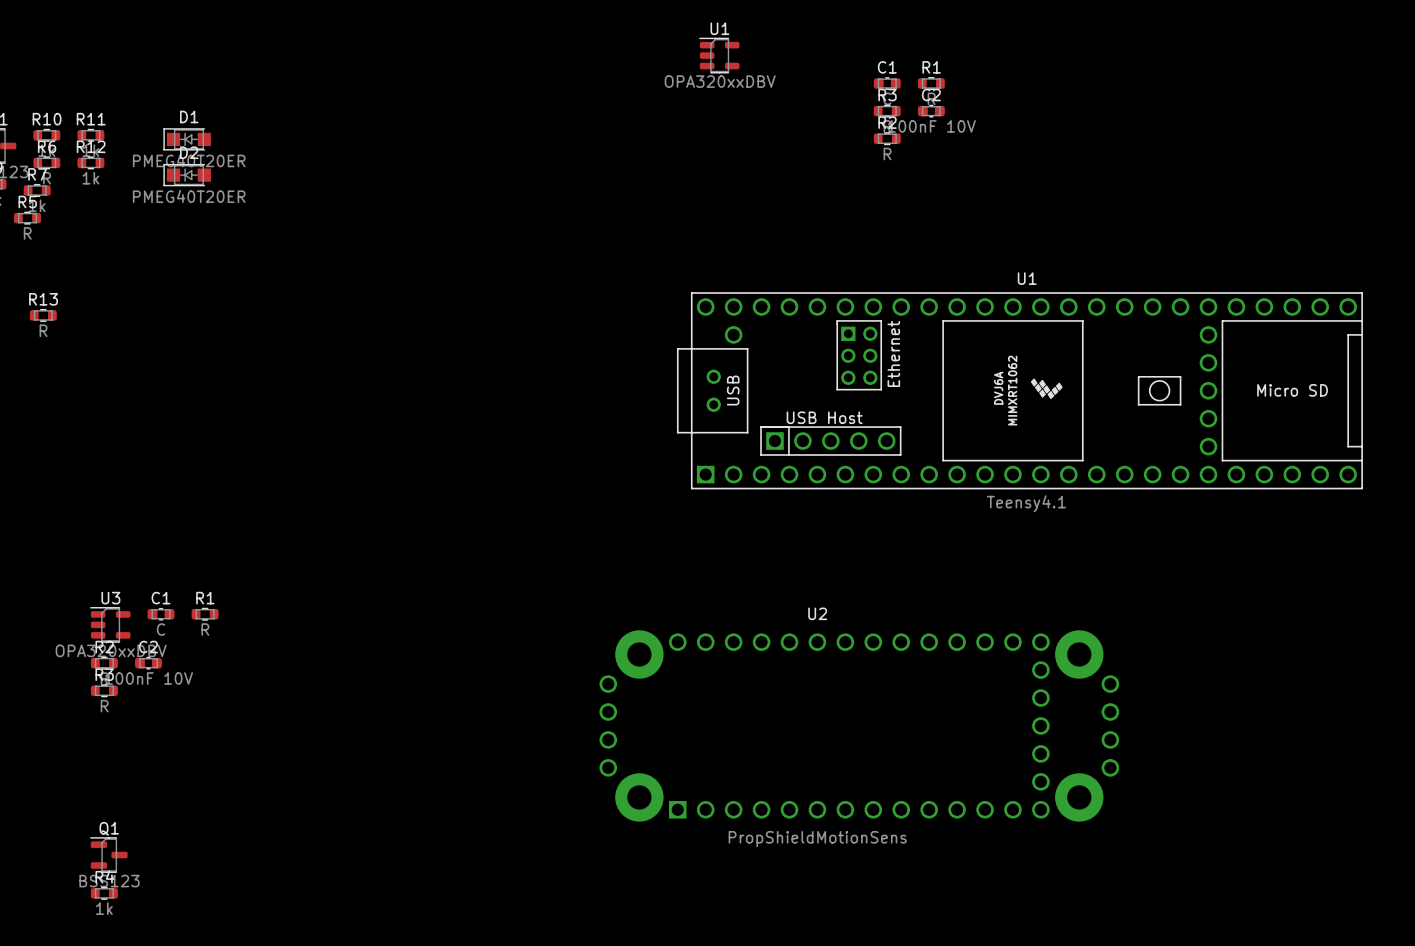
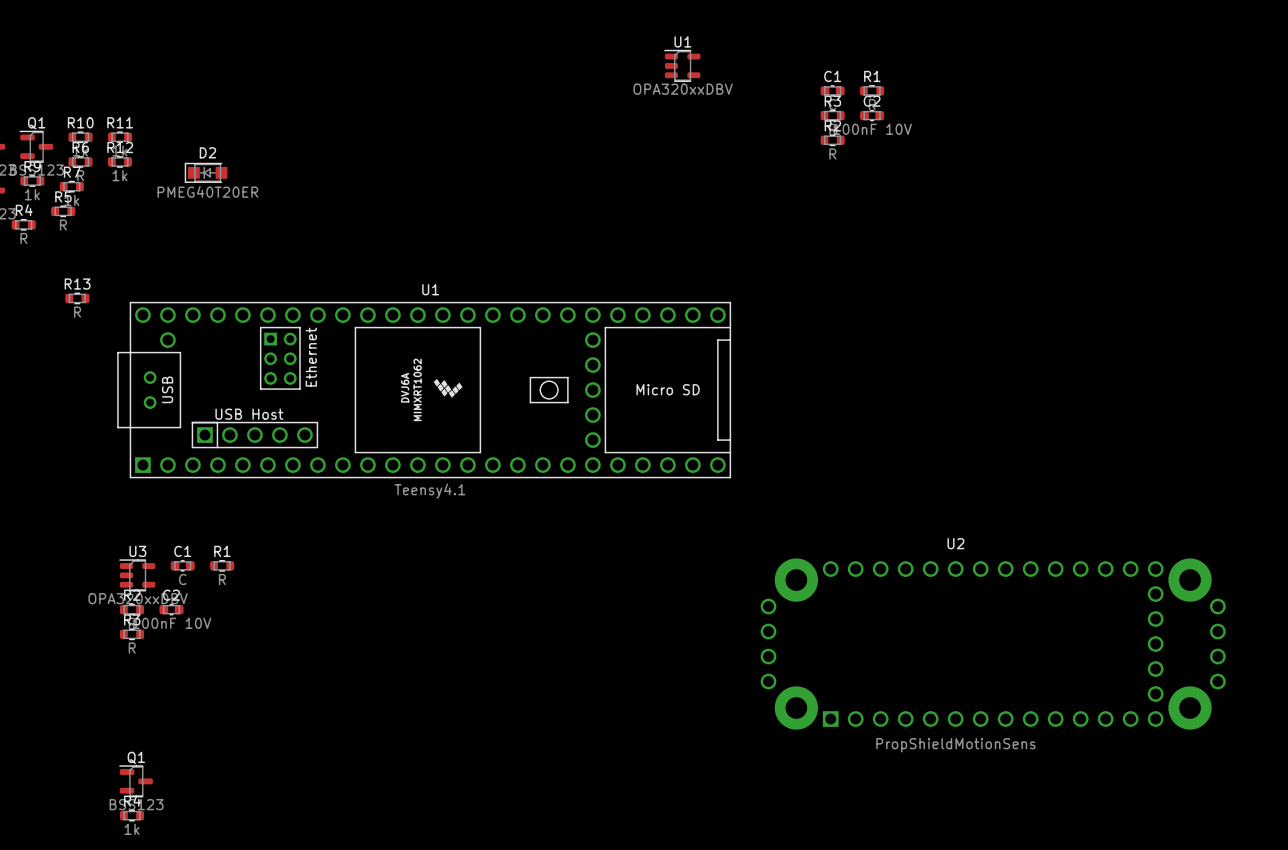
D1: PMEG40T20ER (187, 139) -> none
U1: Teensy4.1 (1019, 390) -> none
U1: none -> Teensy4.1 (424, 390)
U2 position: (859, 725) -> (993, 644)

